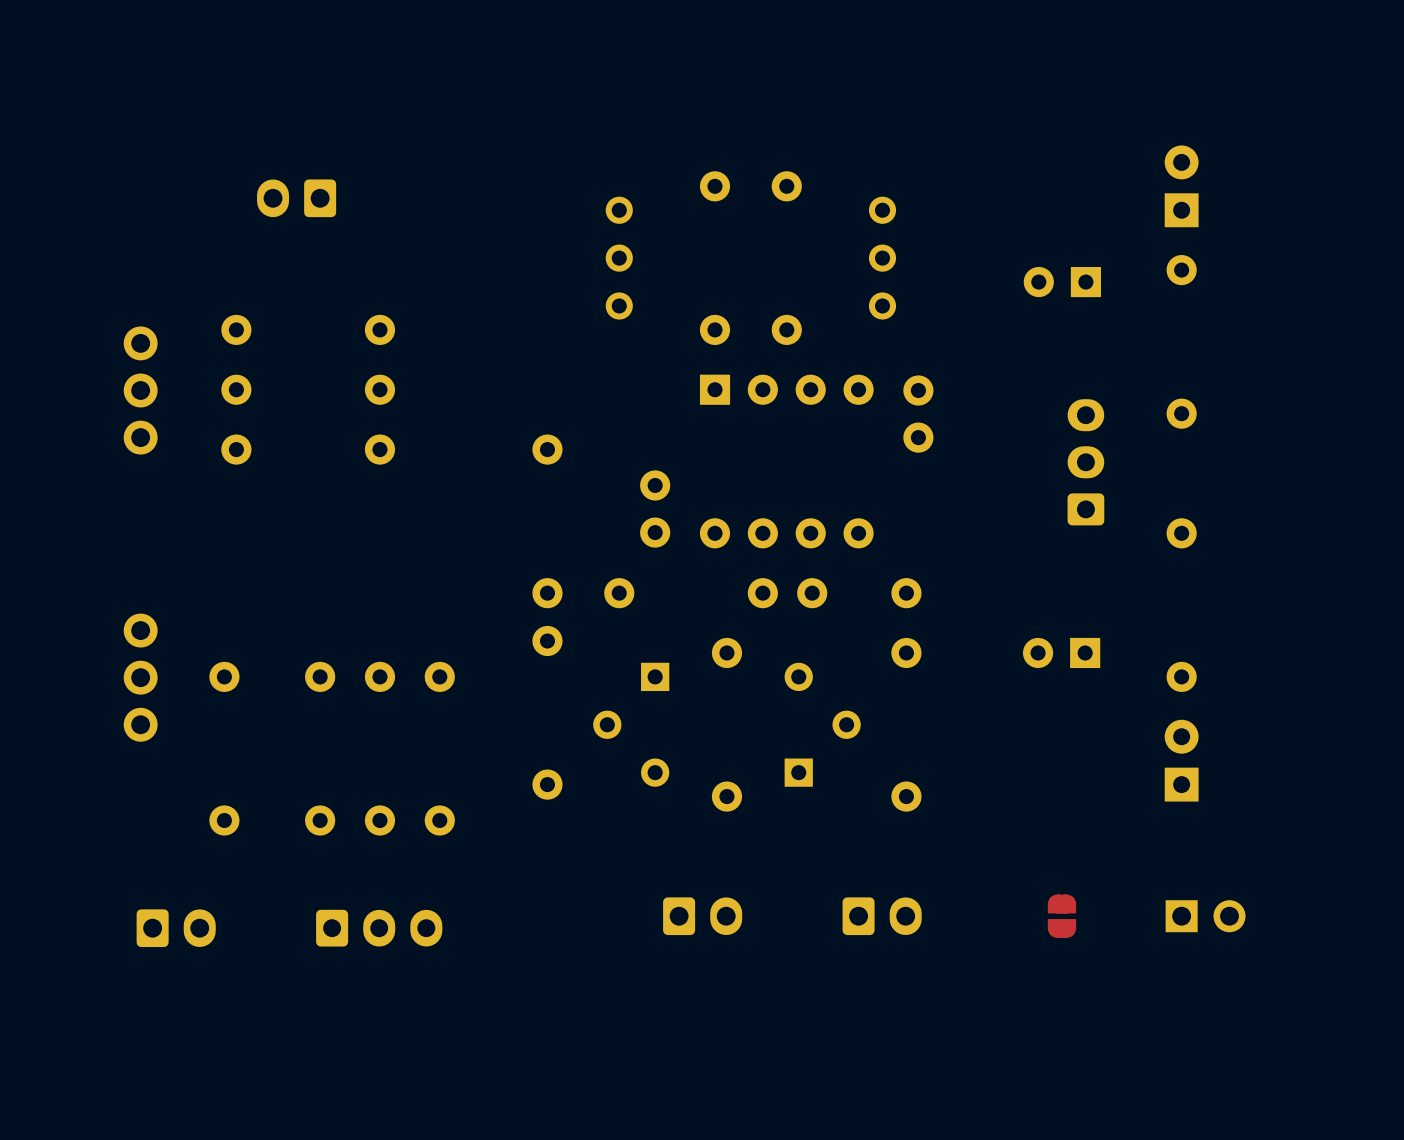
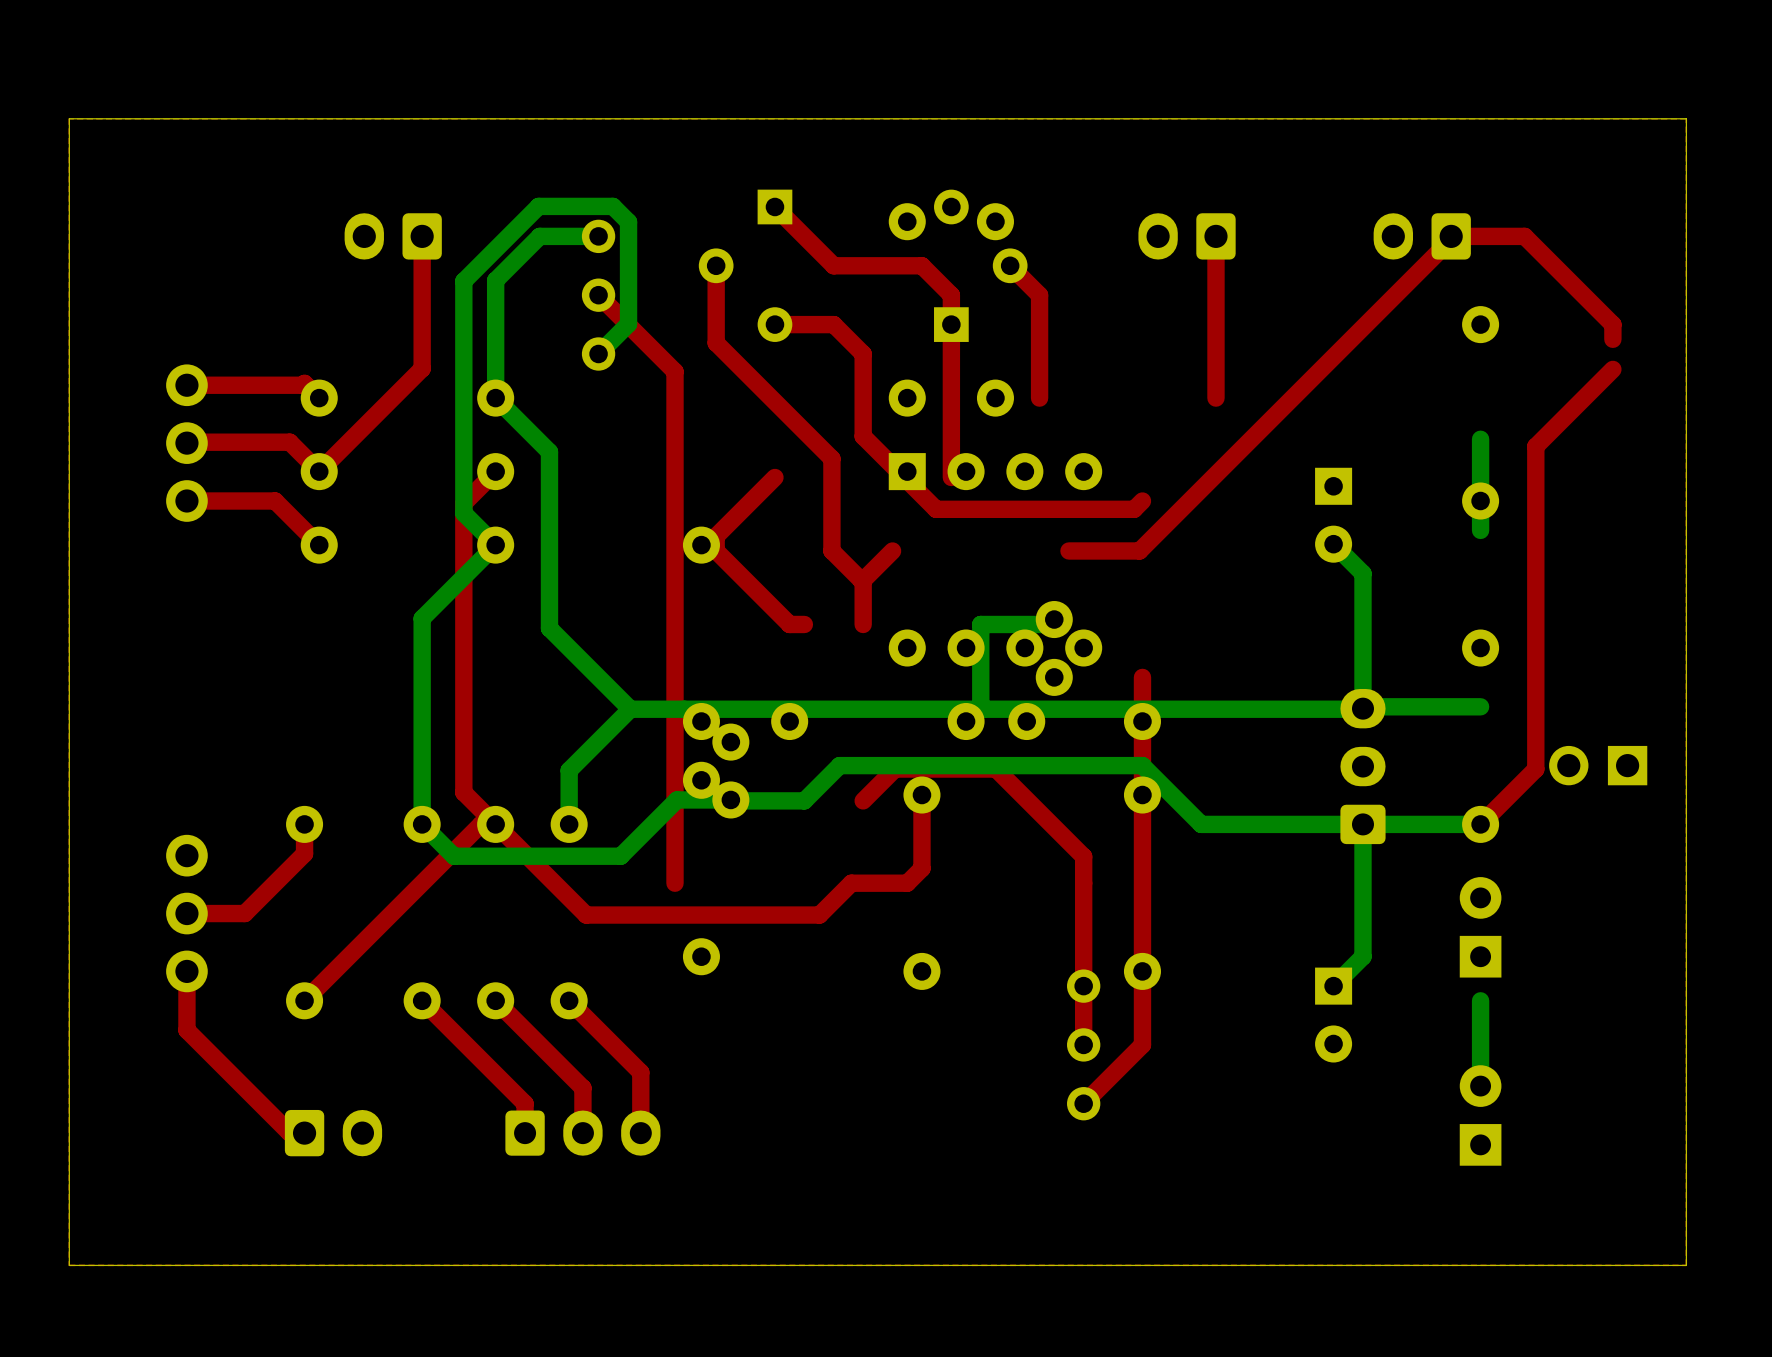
board edge: none -> (1686, 118) (1686, 1265) (69, 1265) (69, 118) (1686, 118)
top track: none -> (774, 206) (833, 265) (921, 265) (951, 295) (951, 477)
part: (1181, 186) -> none
top track: none -> (422, 236) (422, 368) (319, 471) (289, 442) (186, 443)
bottom track: none -> (598, 236) (539, 236) (495, 280) (495, 398) (549, 451) (549, 628) (630, 709)
part: none -> (1187, 236)
top track: none -> (1215, 236) (1215, 398)
part: none -> (1422, 236)
top track: none -> (716, 265) (716, 343) (831, 458) (831, 550) (863, 580)
part: none -> (745, 265)
part: none -> (980, 265)
top track: none -> (1010, 265) (1039, 295) (1039, 398)
top track: none -> (598, 295) (675, 371) (675, 883)
part position: (619, 258) -> (598, 295)
part: (882, 258) -> none
top track: none -> (774, 324) (833, 324) (863, 353) (863, 436) (936, 509) (1134, 509) (1142, 501)
part: (1062, 282) -> none
top track: none -> (1612, 339) (1612, 324) (1524, 236) (1451, 236) (1451, 239) (1139, 550) (1068, 550)
bottom track: none -> (598, 353) (628, 324) (628, 222) (612, 206) (538, 206) (463, 281) (463, 513) (495, 545) (422, 618) (422, 824) (453, 856) (620, 856) (677, 799) (804, 800) (839, 765) (1142, 765) (1201, 824) (1480, 824)
top track: none -> (1612, 369) (1535, 446) (1535, 769) (1480, 824)
top track: none -> (186, 385) (302, 385) (304, 383) (319, 398)
bottom track: none -> (1480, 439) (1480, 530)
top track: none -> (495, 471) (463, 503) (463, 792) (586, 915) (819, 915) (851, 883) (907, 883) (921, 868) (921, 800)
part position: (140, 390) -> (186, 443)
top track: none -> (774, 477) (716, 536) (716, 550) (789, 624) (804, 624)
top track: none -> (186, 501) (275, 501) (319, 545)
part: (918, 414) -> none
part: none -> (1333, 515)
bottom track: none -> (1333, 544) (1362, 573) (1362, 708)
top track: none -> (892, 550) (863, 580)
part position: (1085, 462) -> (1362, 766)
top track: none -> (863, 580) (863, 624)
part: (655, 509) -> none
bottom track: none -> (1054, 619) (1049, 624) (980, 624) (980, 706) (983, 709)
part: none -> (1054, 648)
top track: none -> (1142, 677) (1142, 1044) (1083, 1103)
bottom track: none -> (1480, 706) (1364, 706) (1362, 709) (630, 709)
bottom track: none -> (630, 709) (569, 770) (569, 824)
part: none -> (730, 771)
part: (1061, 652) -> none
top track: none -> (863, 800) (895, 769) (996, 769) (1083, 856) (1083, 1044)
top track: none -> (304, 824) (304, 853) (244, 913) (186, 913)
top track: none -> (495, 824) (480, 824) (304, 1000)
bottom track: none -> (1362, 824) (1362, 956) (1333, 986)
part position: (140, 677) -> (186, 913)
part: (631, 724) -> none
part: (822, 724) -> none
top track: none -> (186, 971) (186, 1030) (289, 1133) (304, 1133)
top track: none -> (422, 1000) (525, 1103) (525, 1133)
top track: none -> (495, 1000) (582, 1088) (582, 1133)
top track: none -> (569, 1000) (640, 1072) (640, 1133)
bottom track: none -> (1480, 1000) (1480, 1086)
part: none -> (1333, 1015)
part: none -> (1083, 1044)
part: none -> (1480, 1115)
part: (702, 916) -> none
part: (882, 916) -> none
part: (1061, 916) -> none
part rotation: 0° (1205, 916) -> 180° (1598, 765)
part position: (1205, 916) -> (1598, 765)
part position: (176, 928) -> (333, 1133)
part position: (379, 928) -> (582, 1133)

